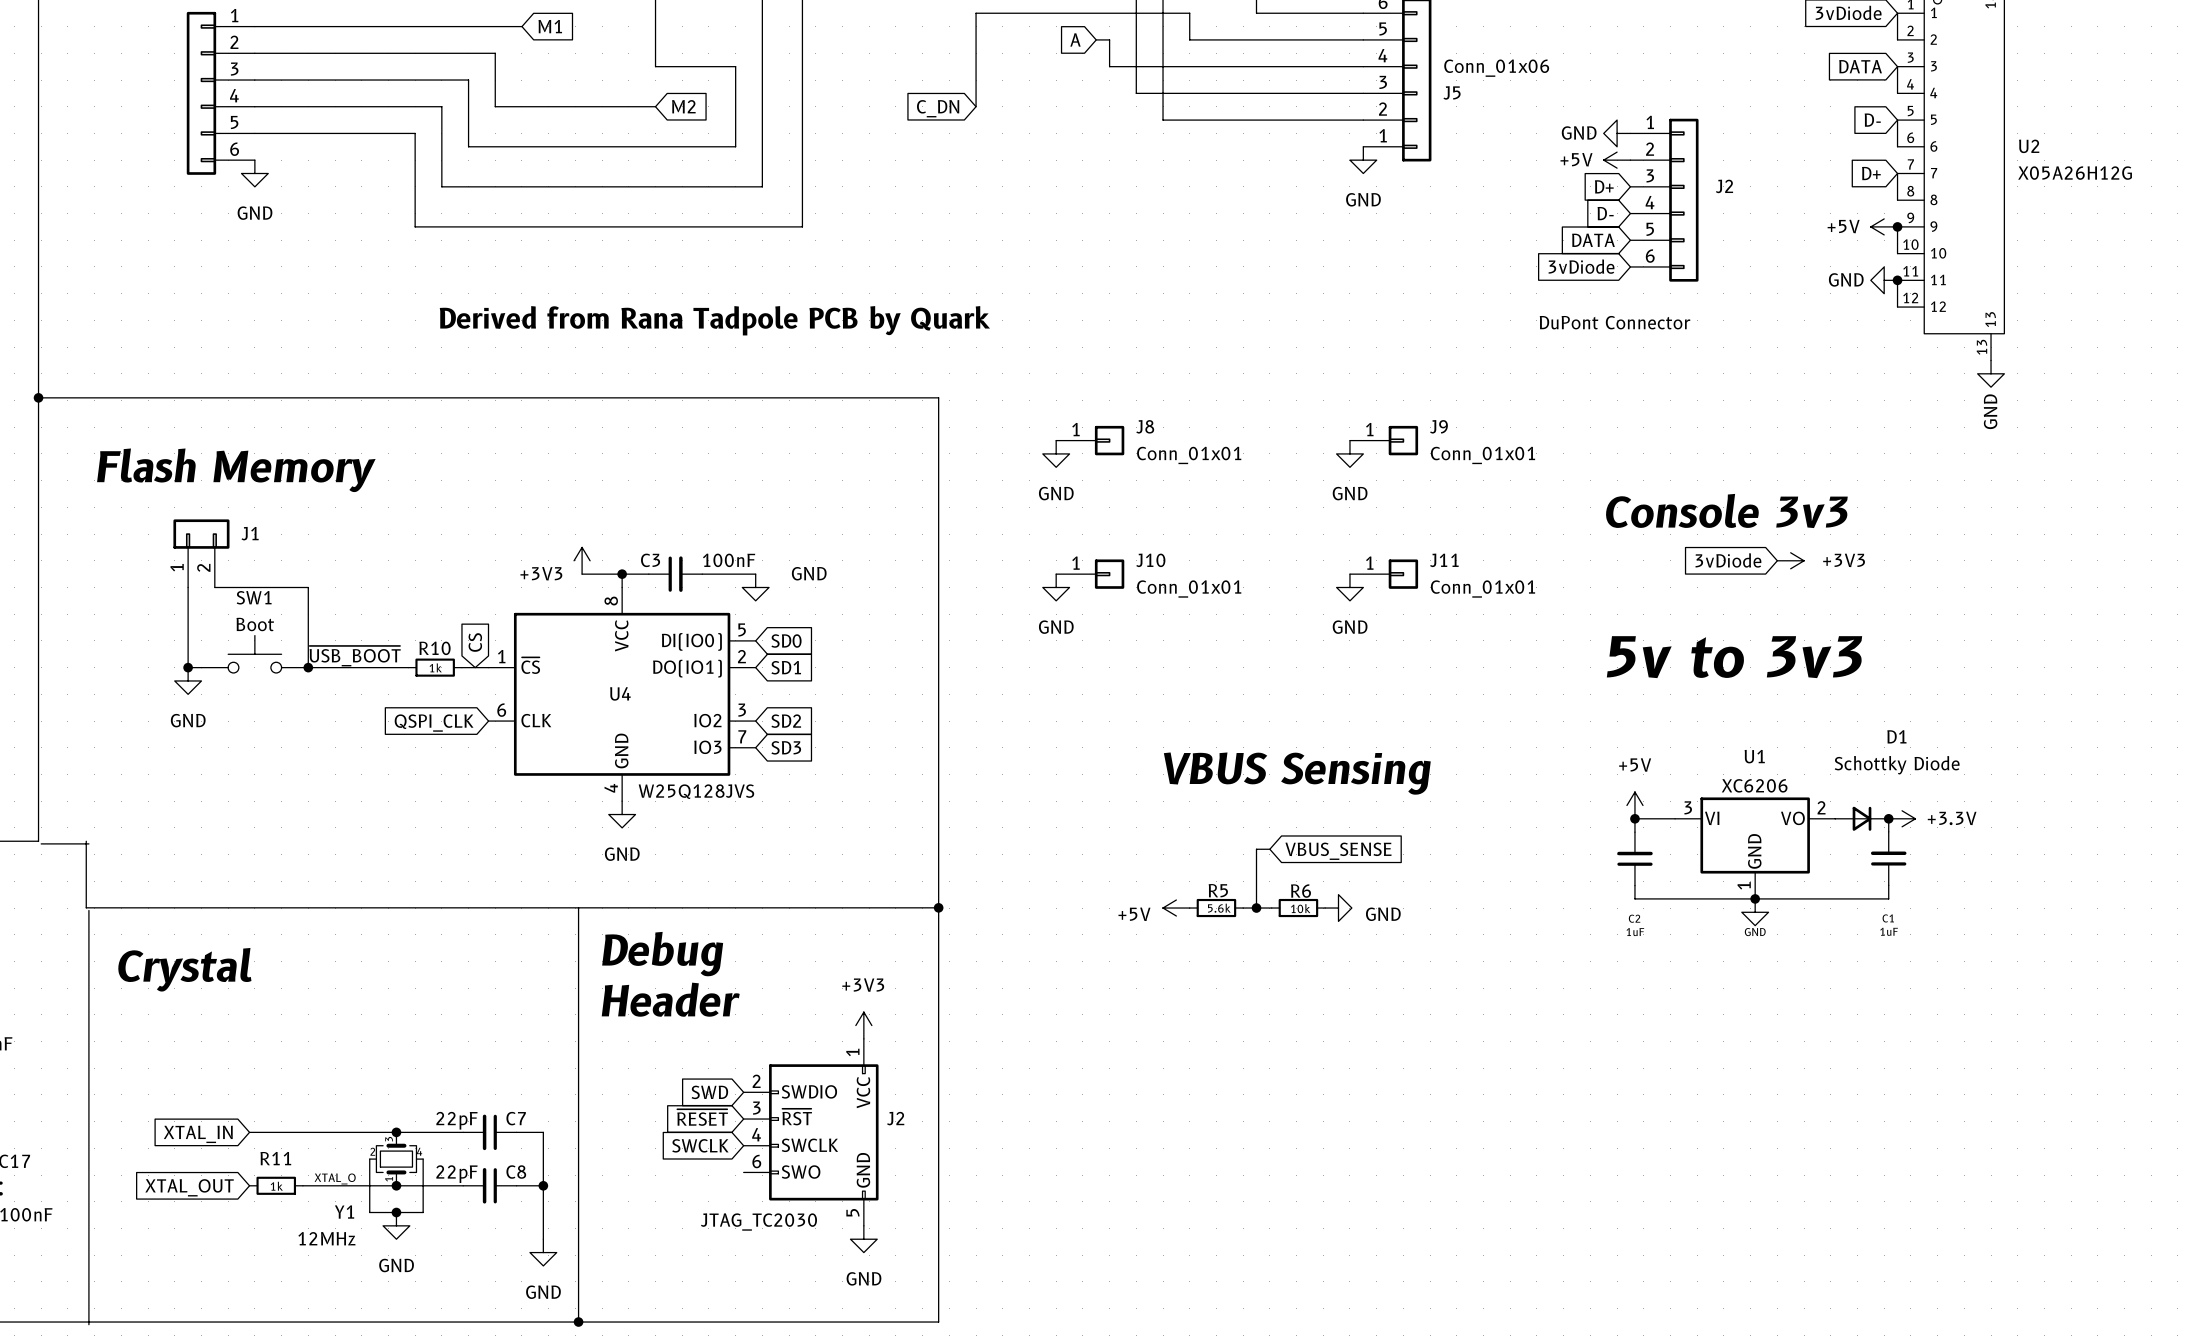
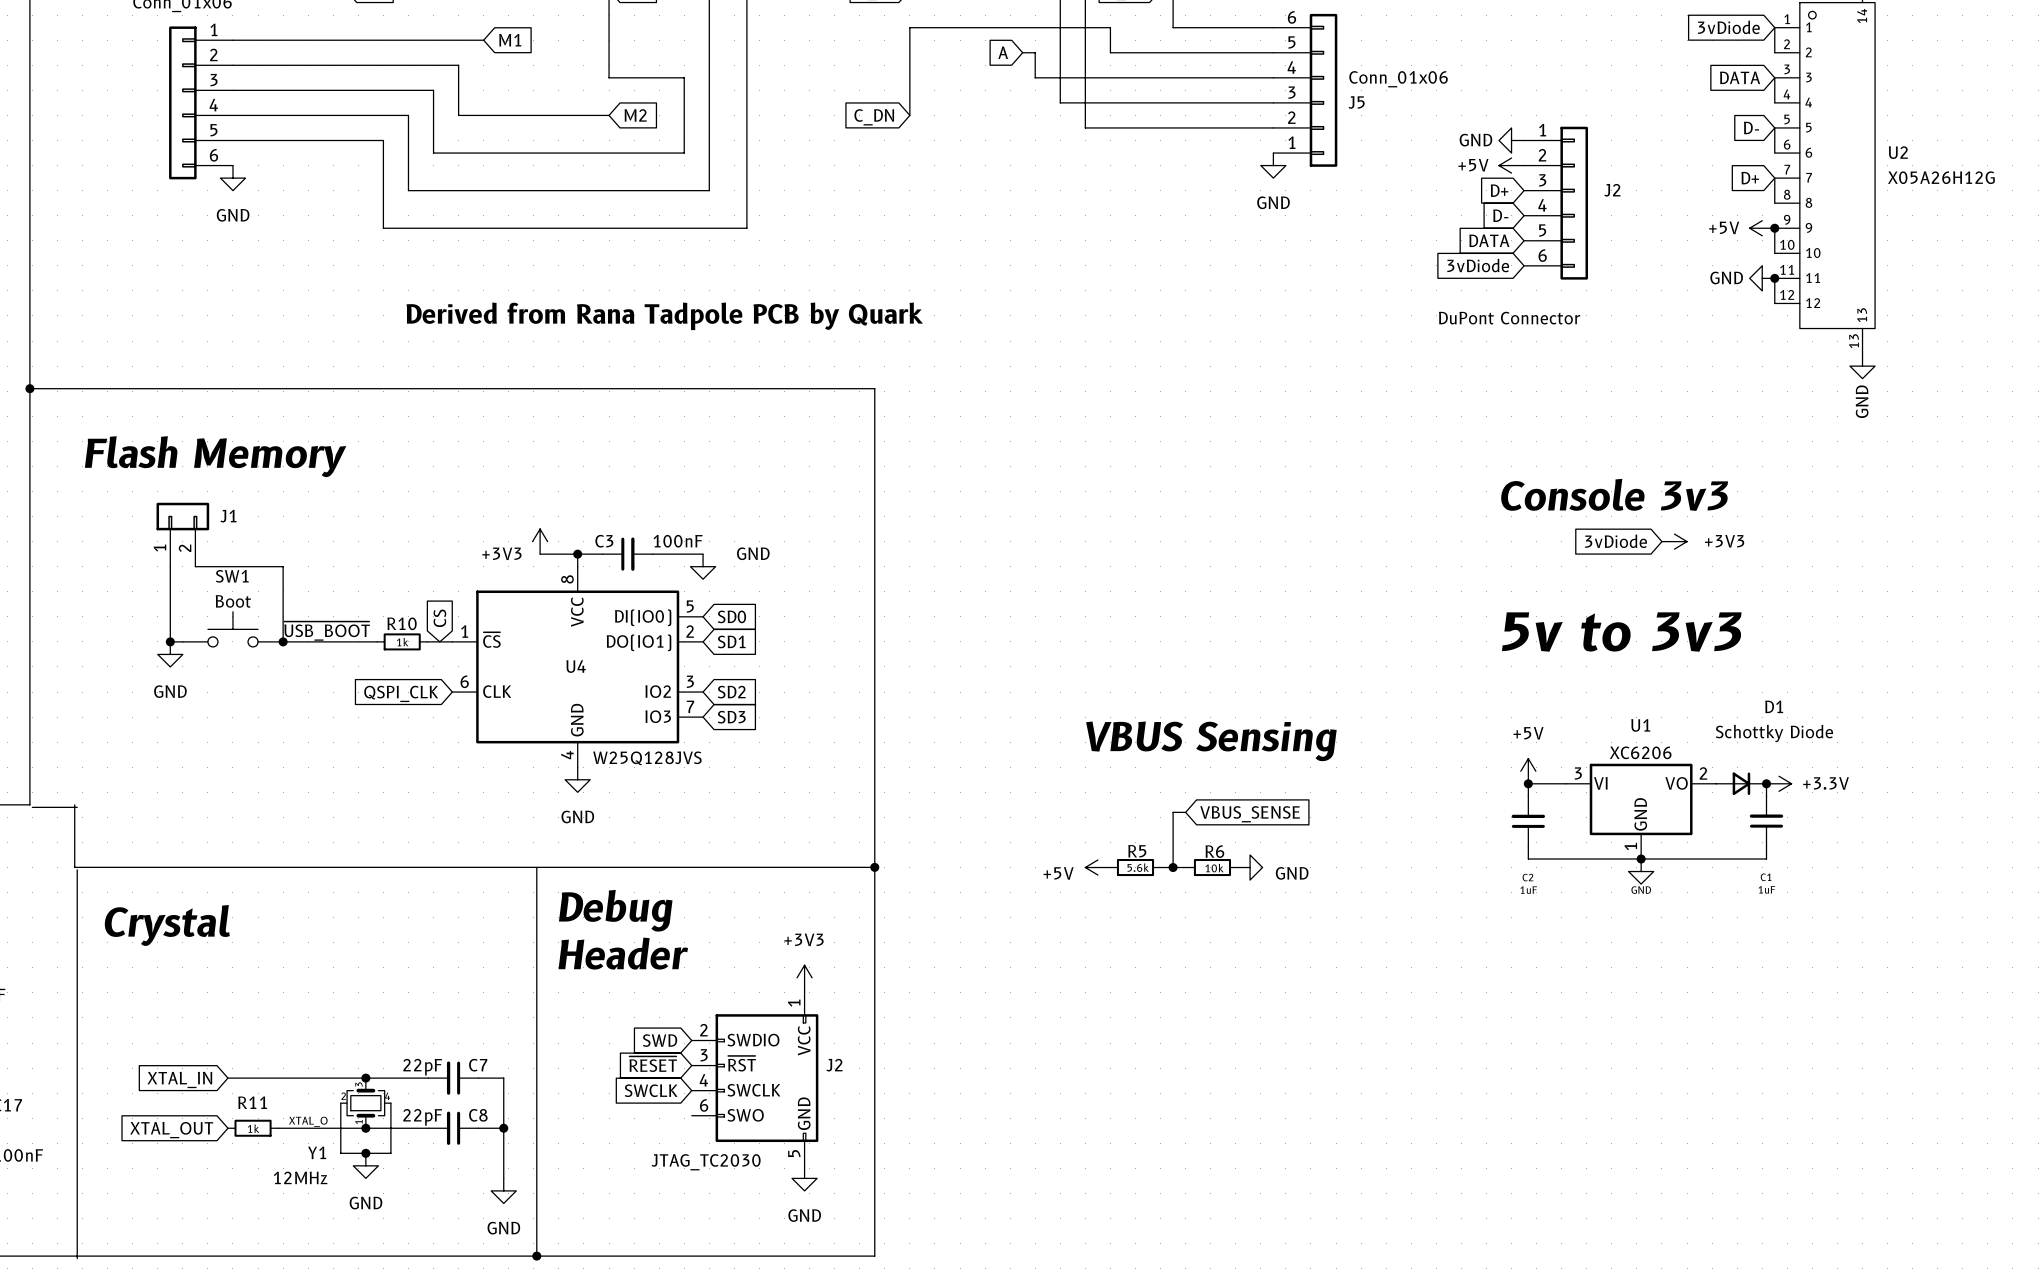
J8: Conn_01x01 (1090, 440) -> none
J9: Conn_01x01 (1384, 440) -> none
power symbol: GND (1056, 453) -> none
power symbol: GND (1349, 453) -> none
J10: Conn_01x01 (1090, 574) -> none
J11: Conn_01x01 (1384, 574) -> none
power symbol: GND (1056, 587) -> none
power symbol: GND (1349, 587) -> none

